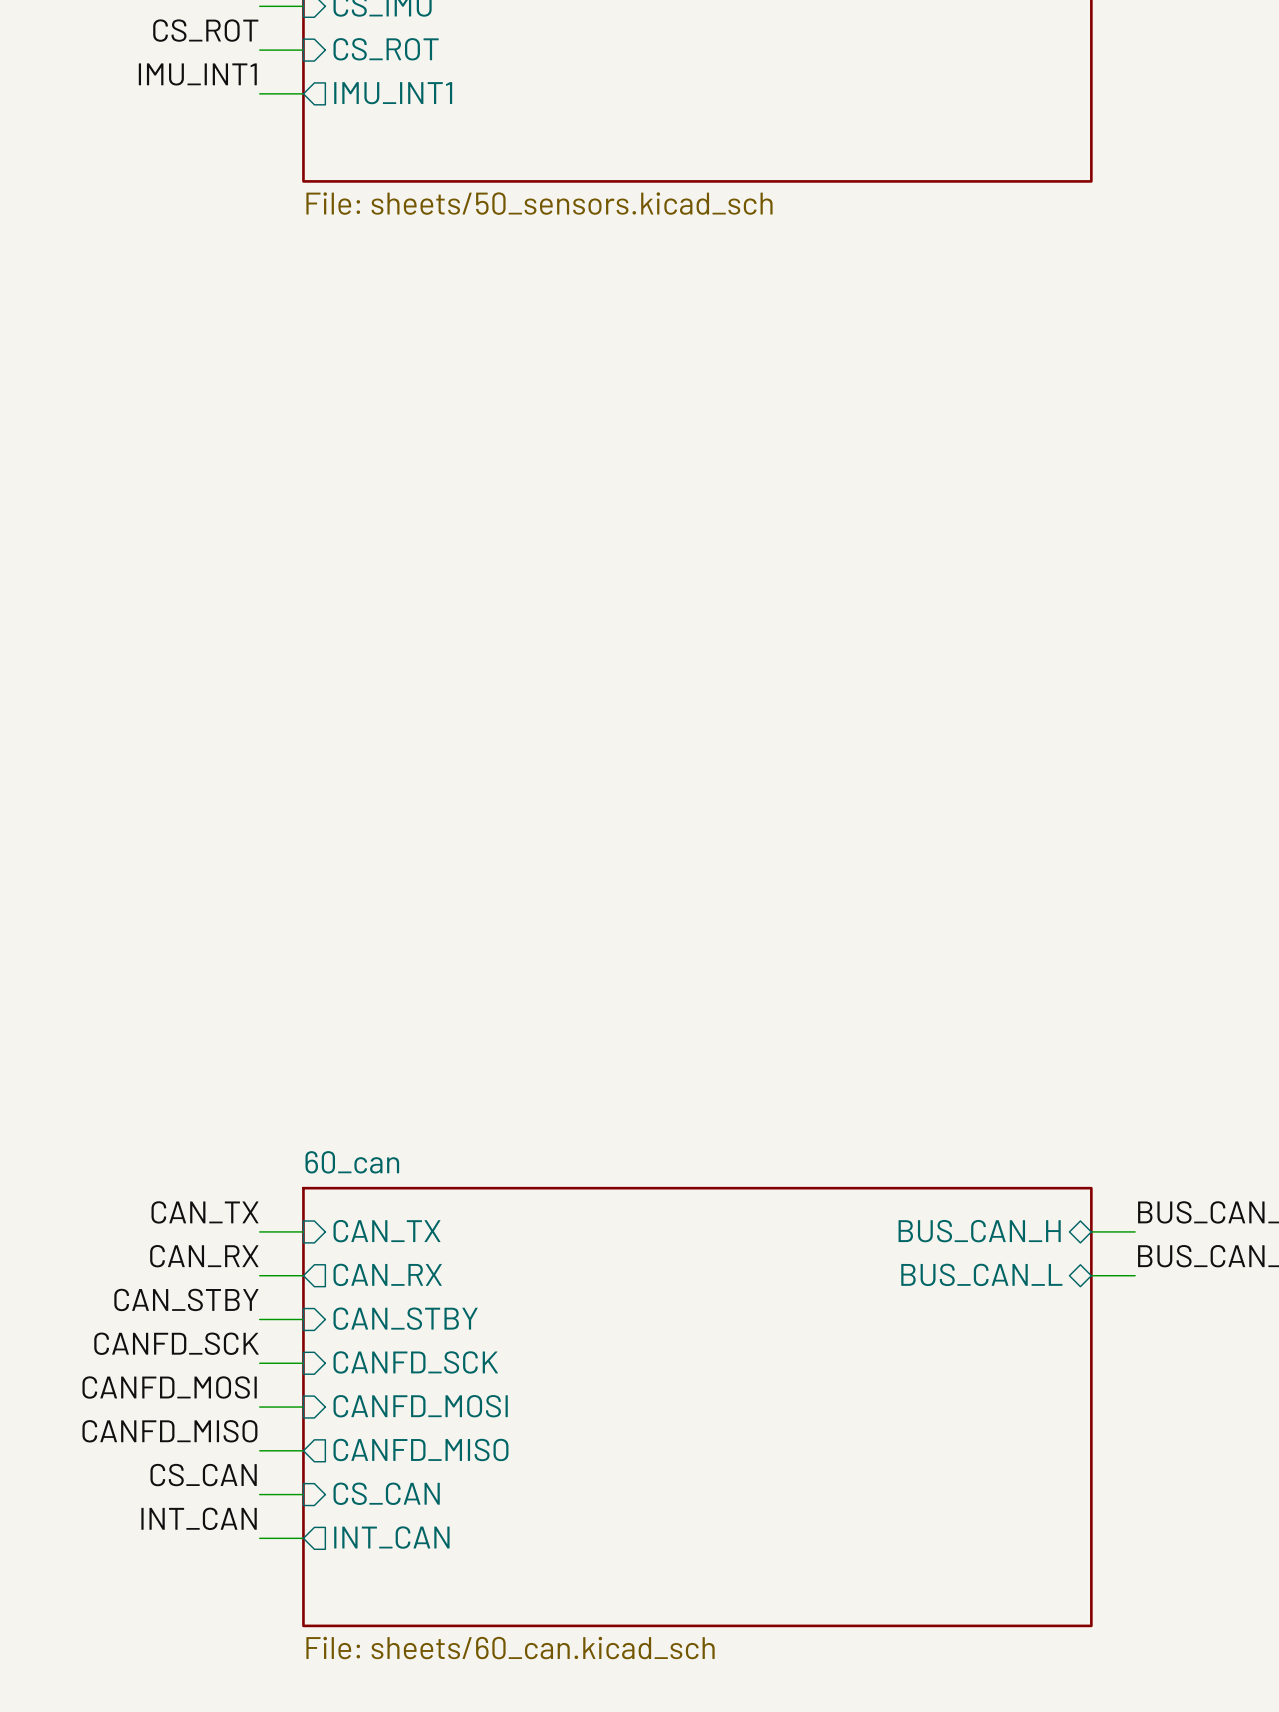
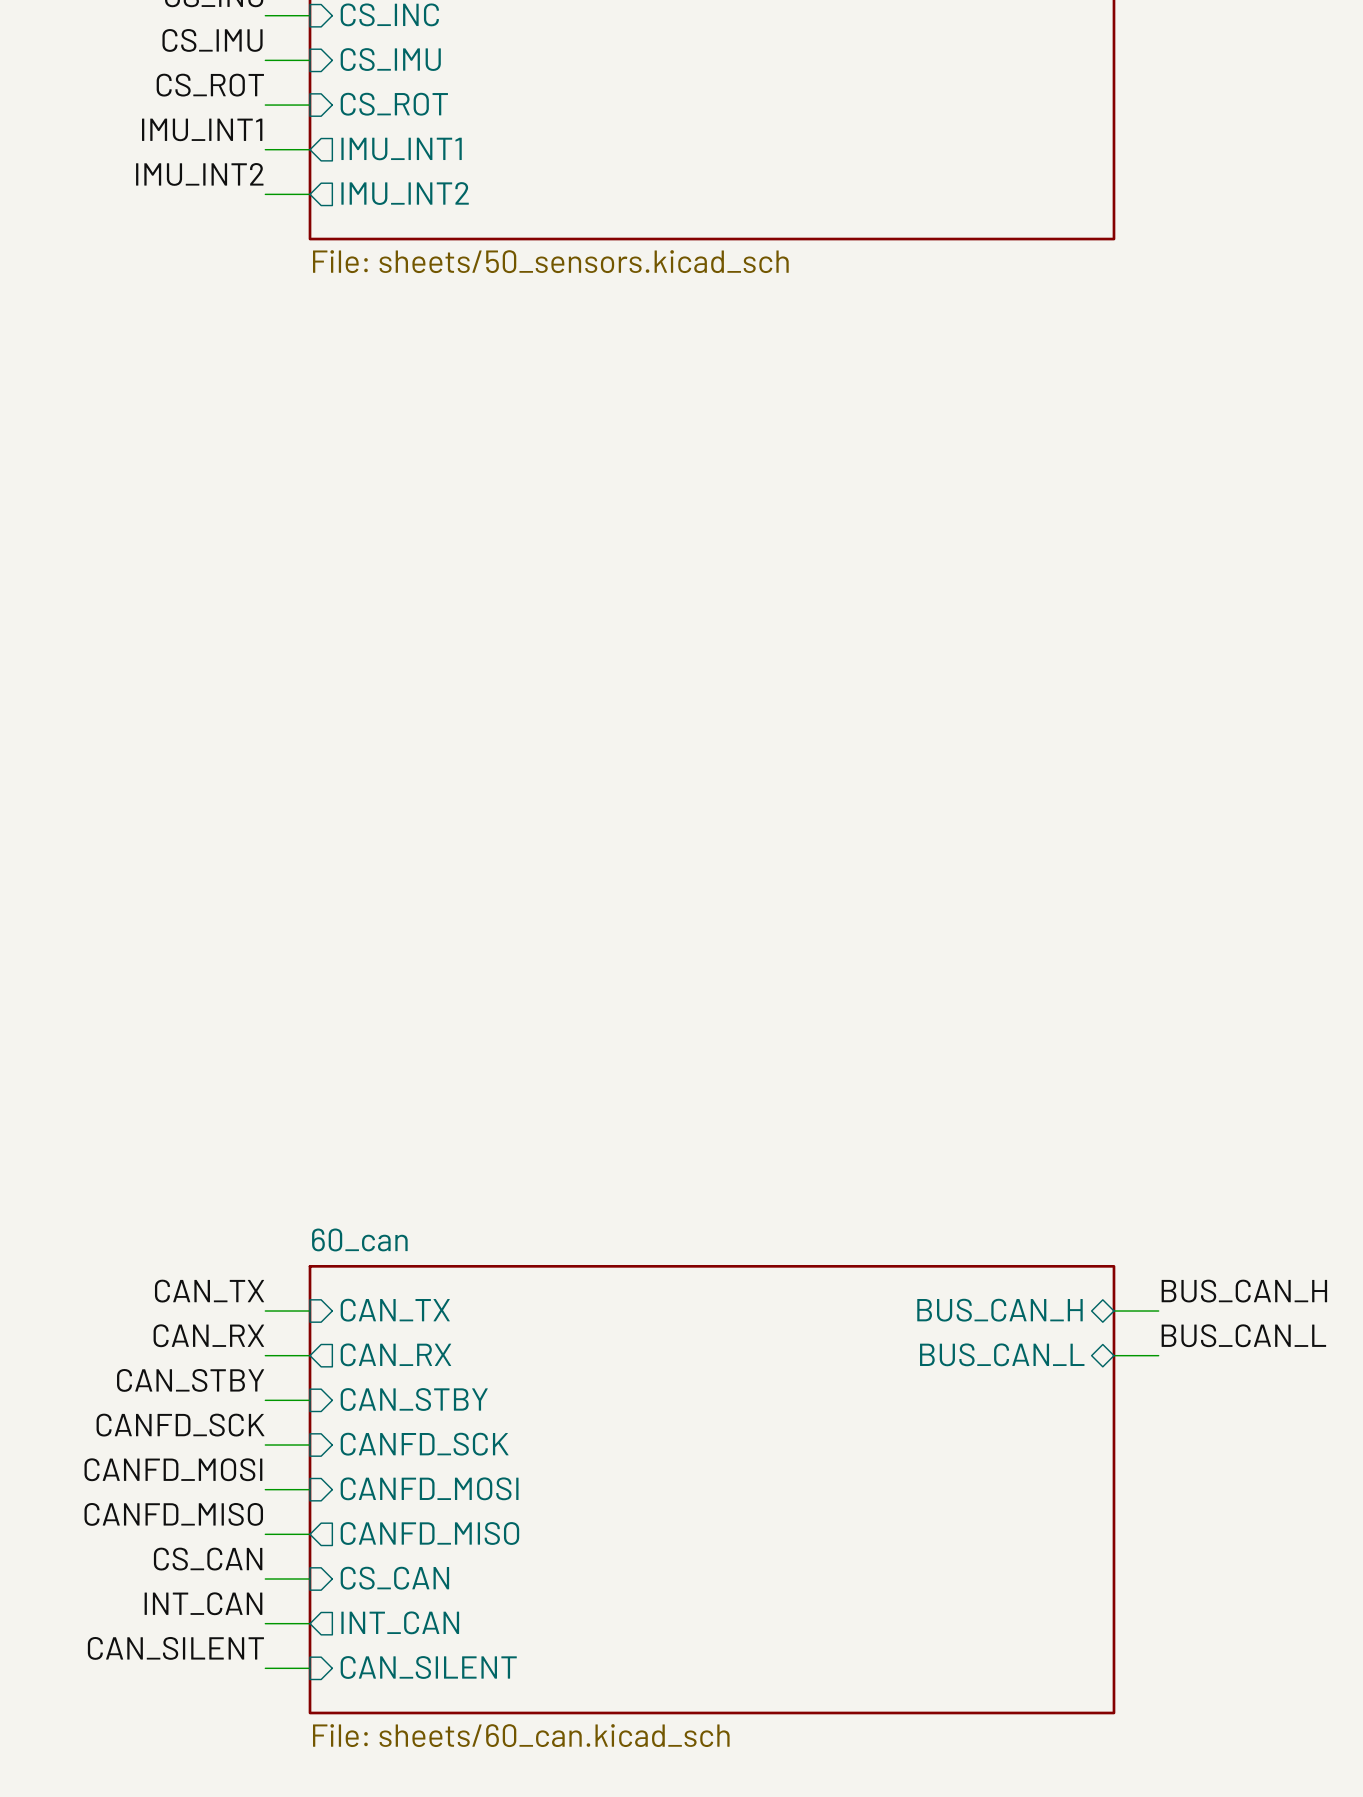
label: none -> IMU_INT2 (199, 174)
sheet pin: none -> IMU_INT2 (405, 193)
wire: none -> (265, 194) (310, 194)
label: none -> CAN_SILENT (175, 1648)
sheet pin: none -> CAN_SILENT (428, 1667)
wire: none -> (265, 1668) (310, 1668)

